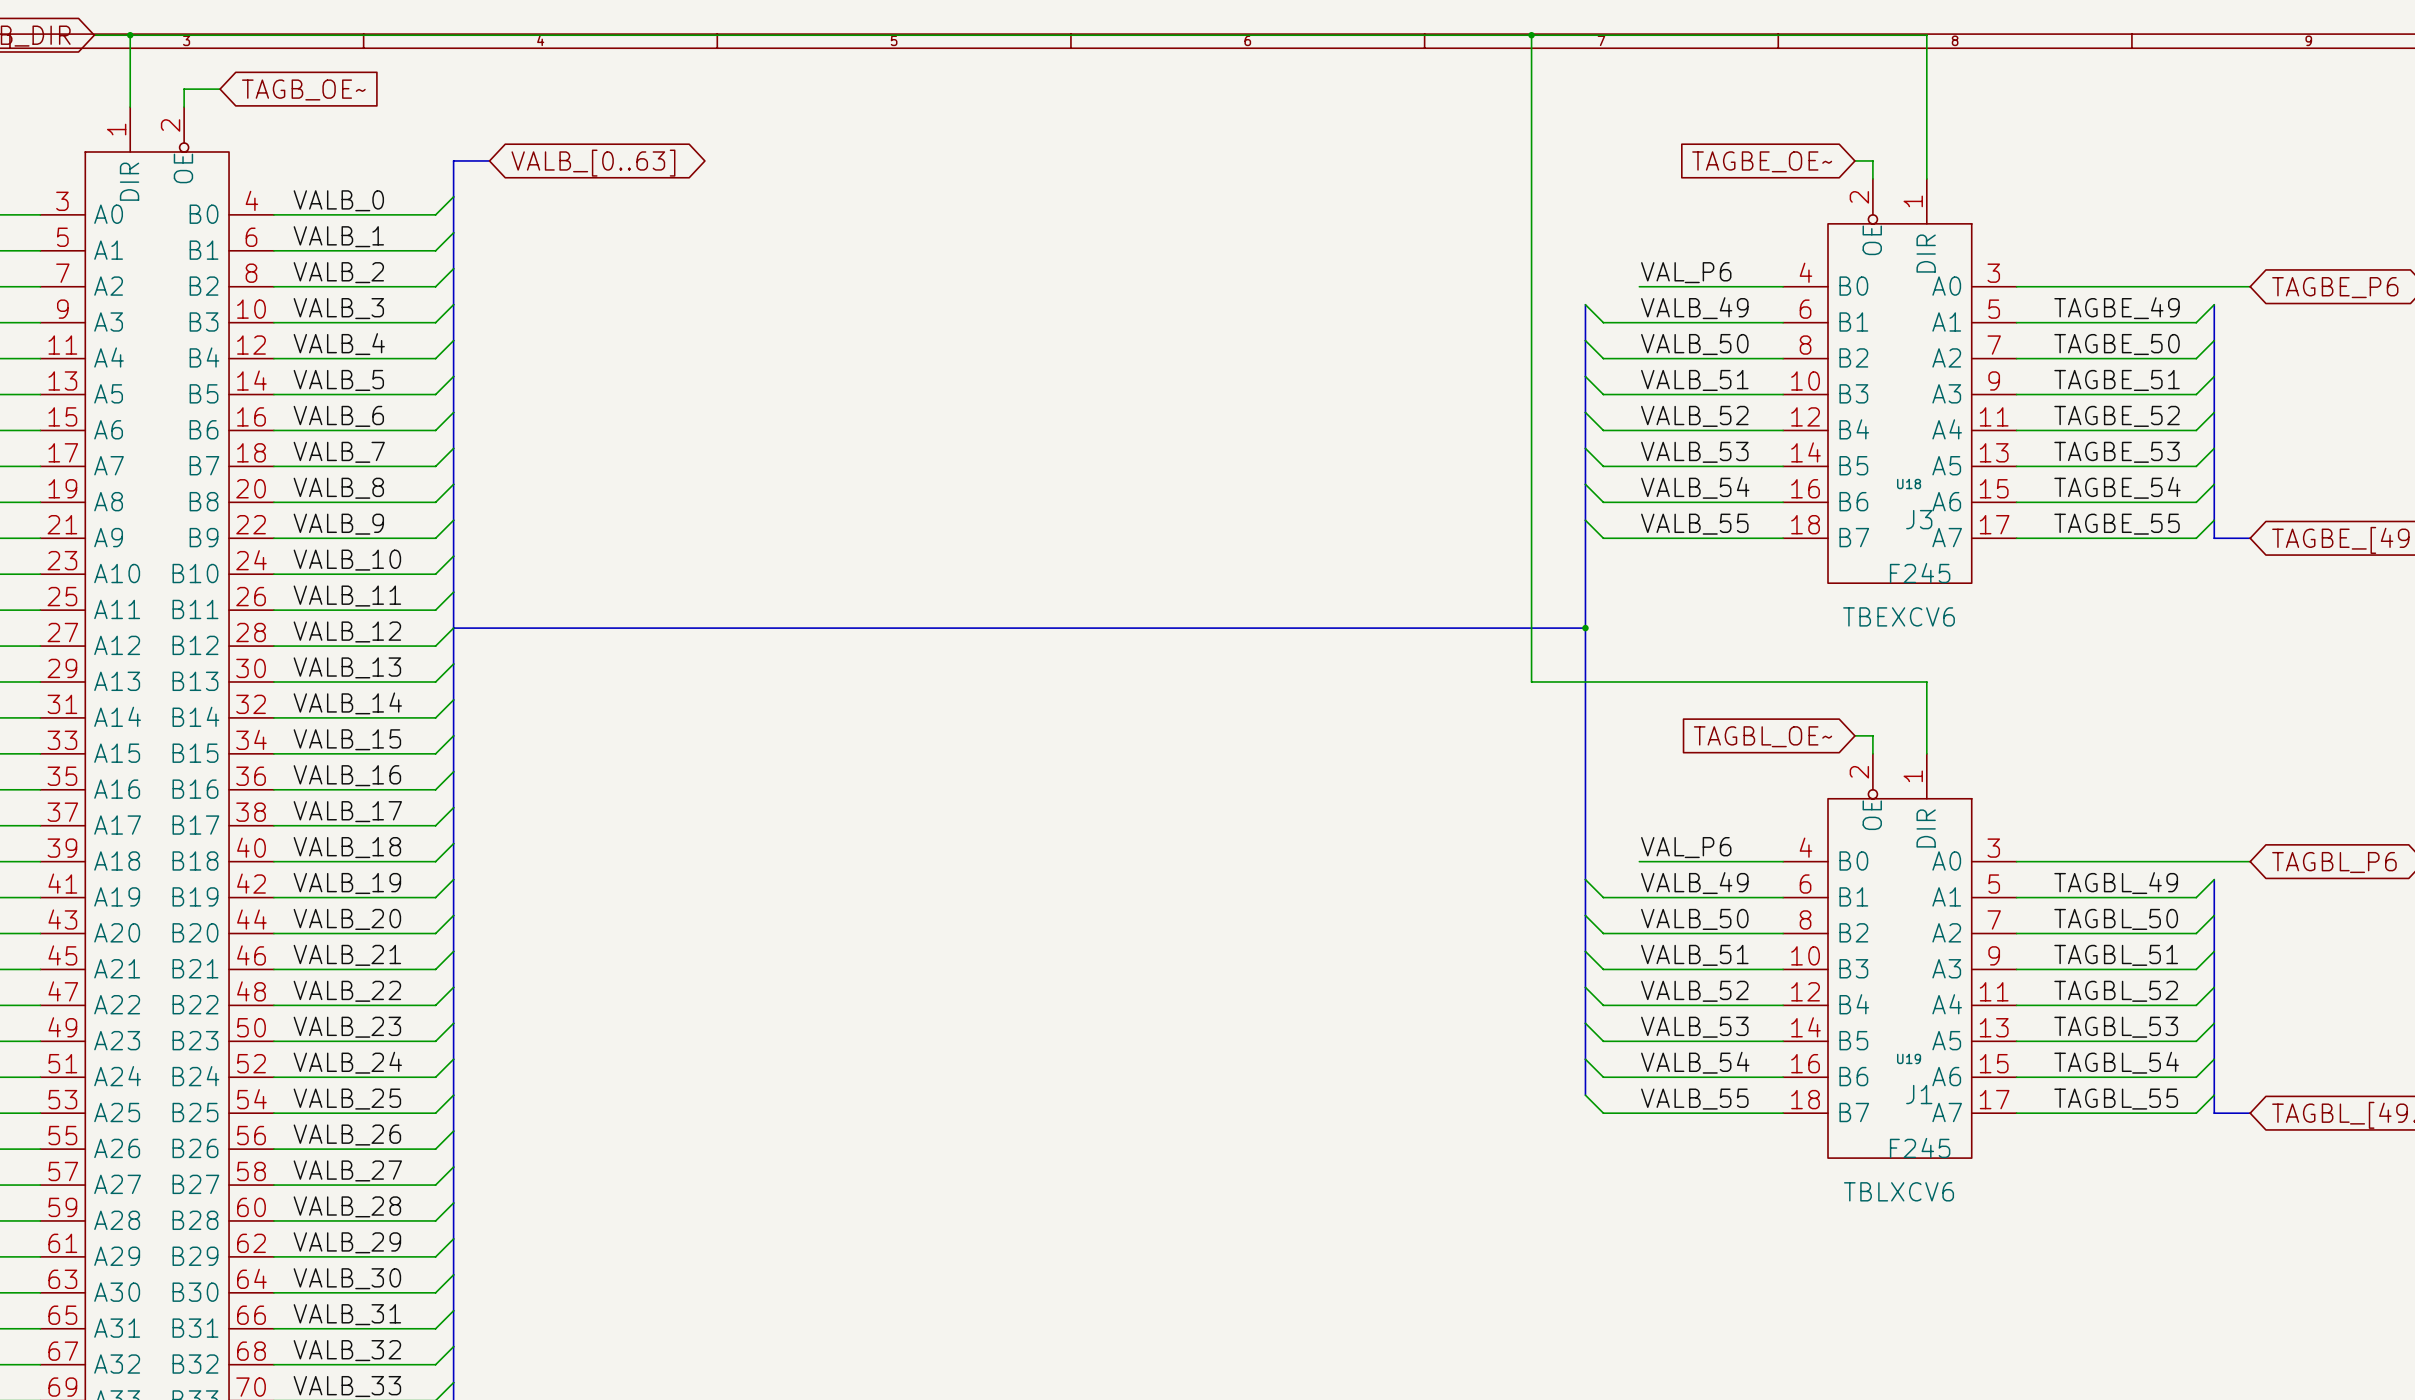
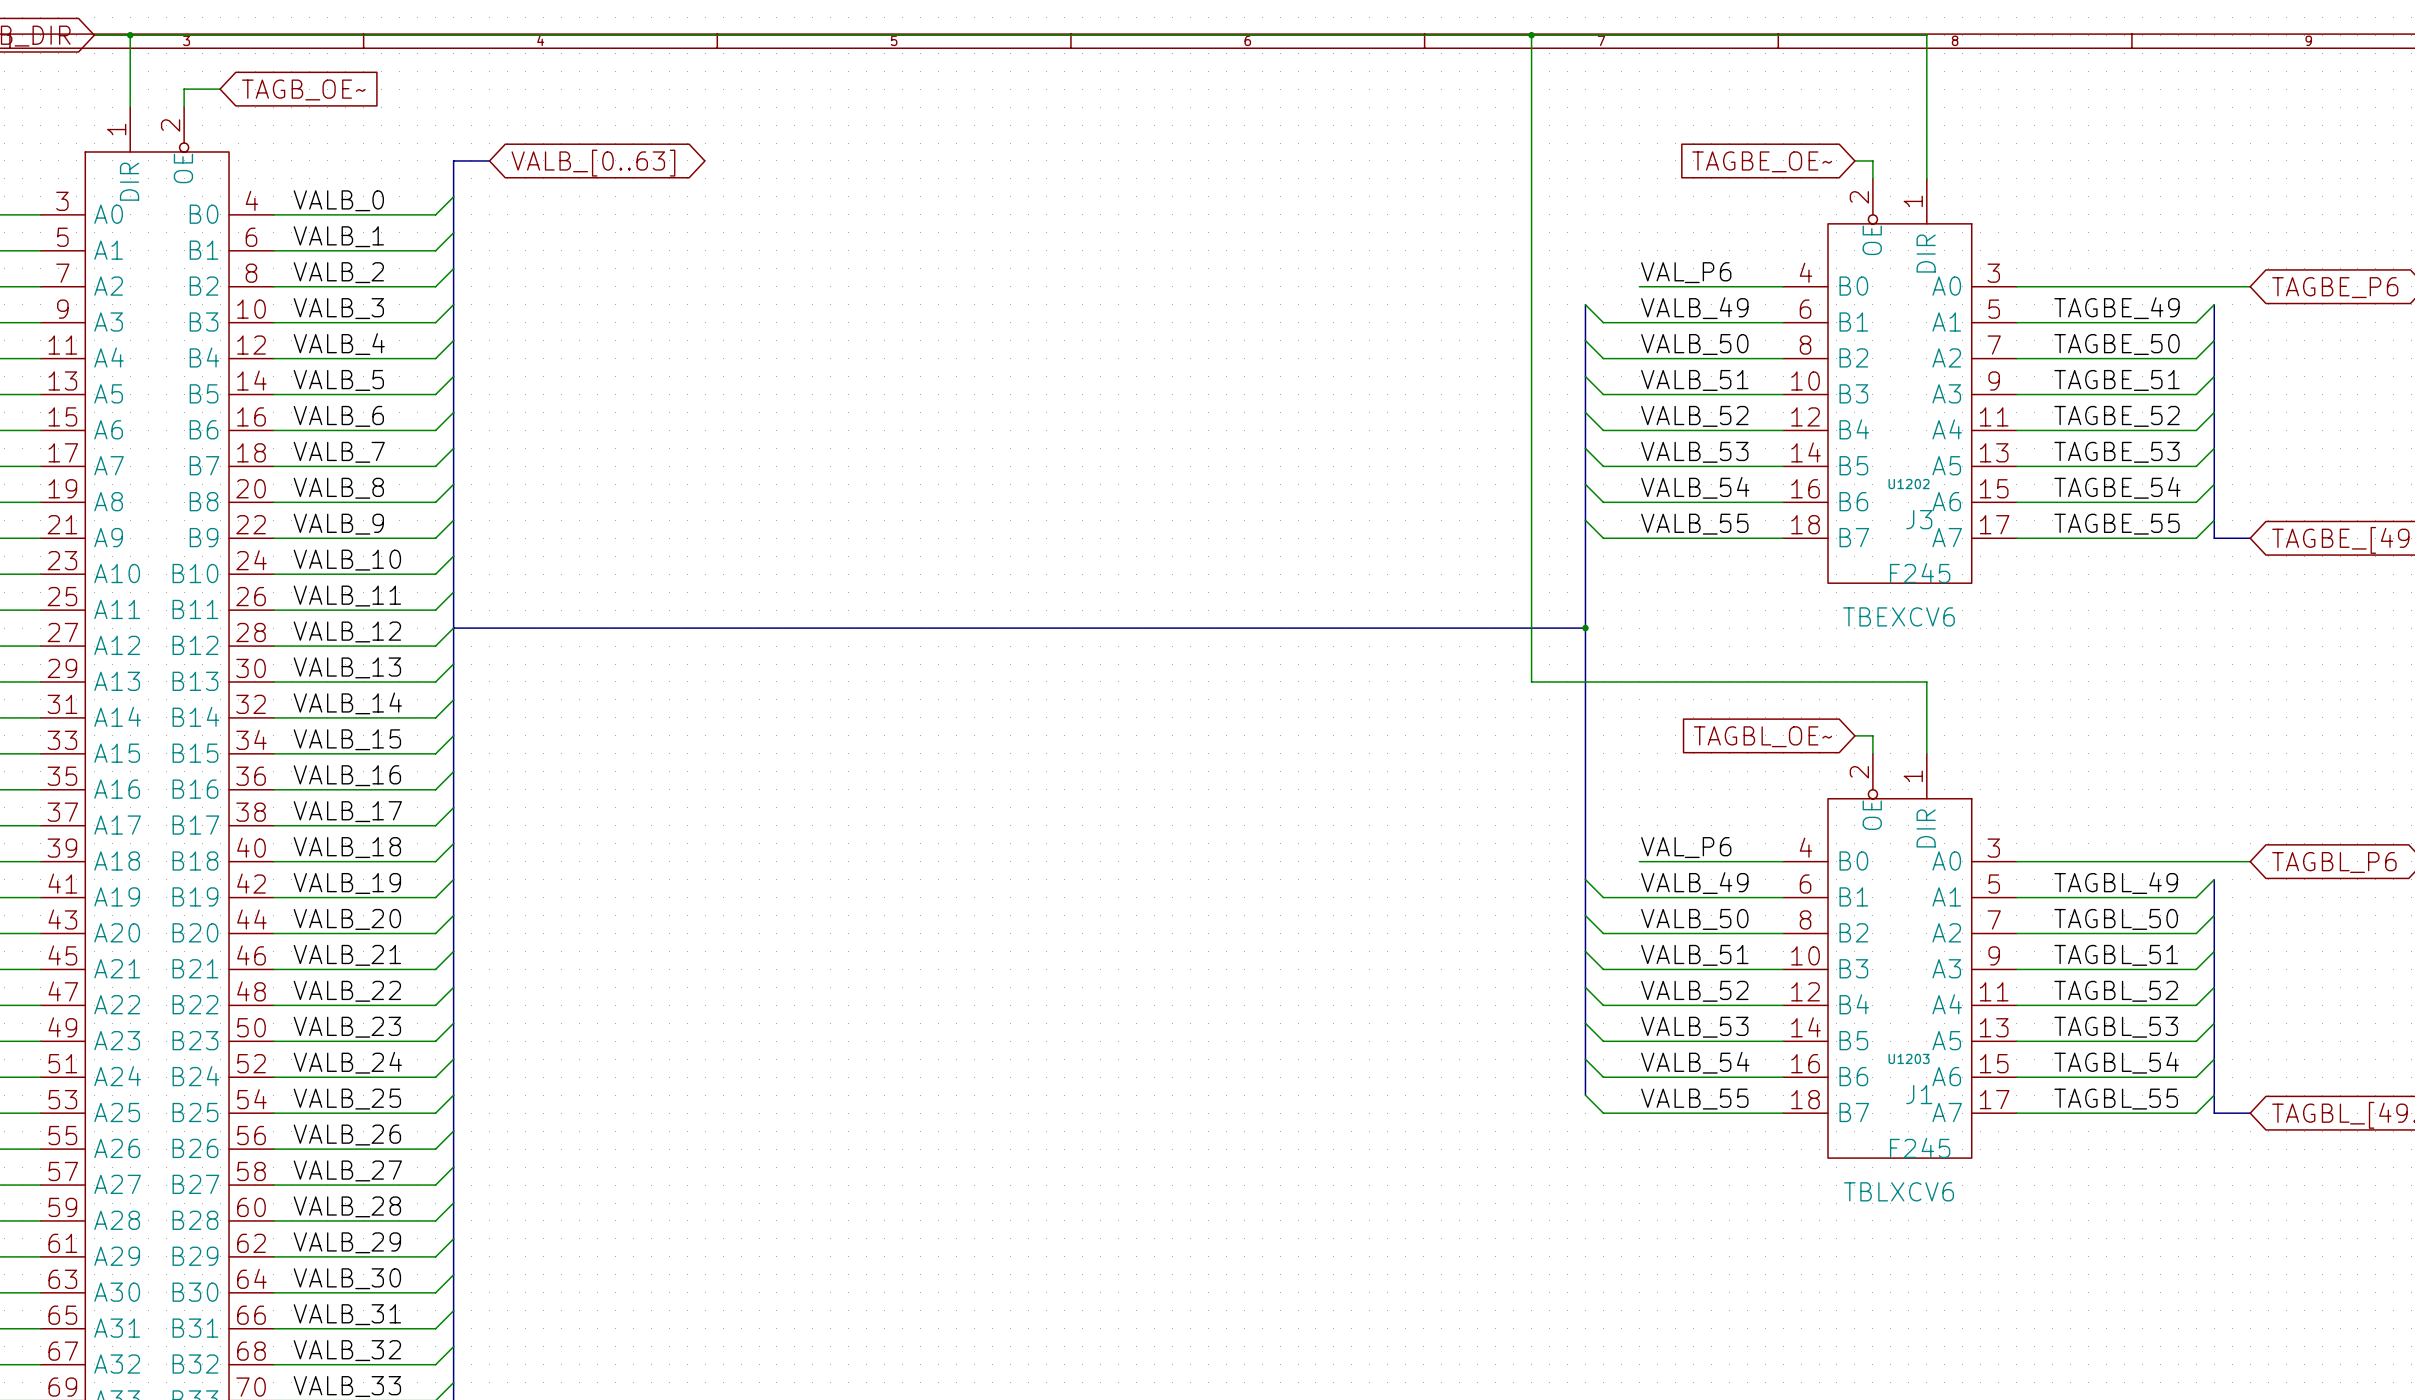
U18 name: U18 (1909, 484) -> U1202 (1909, 484)
U19 name: U19 (1909, 1058) -> U1203 (1909, 1058)

